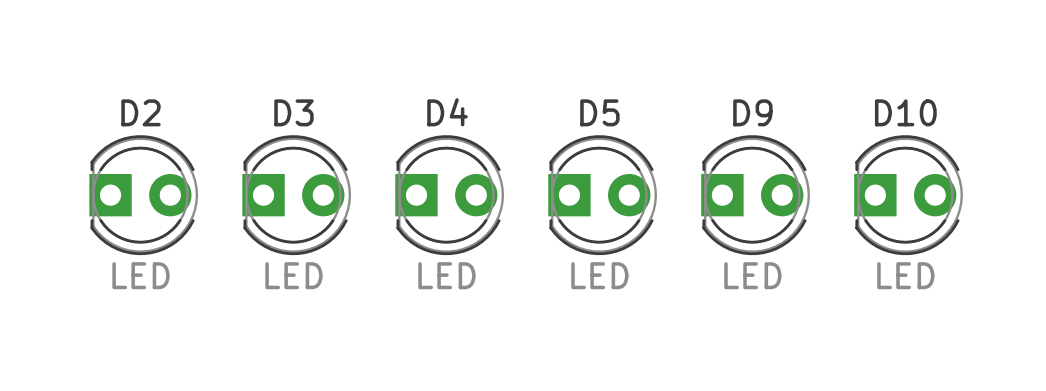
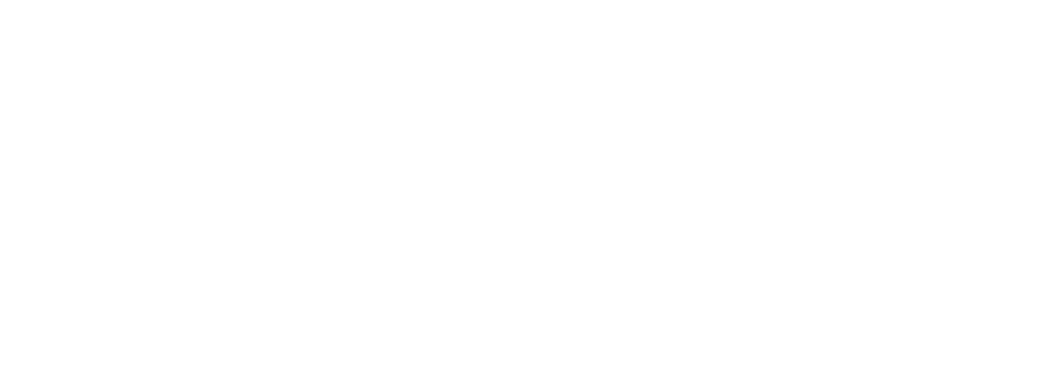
D2: LED (143, 195) -> none
D3: LED (296, 195) -> none
D4: LED (449, 195) -> none
D5: LED (602, 195) -> none
D9: LED (755, 195) -> none
D10: LED (908, 195) -> none

